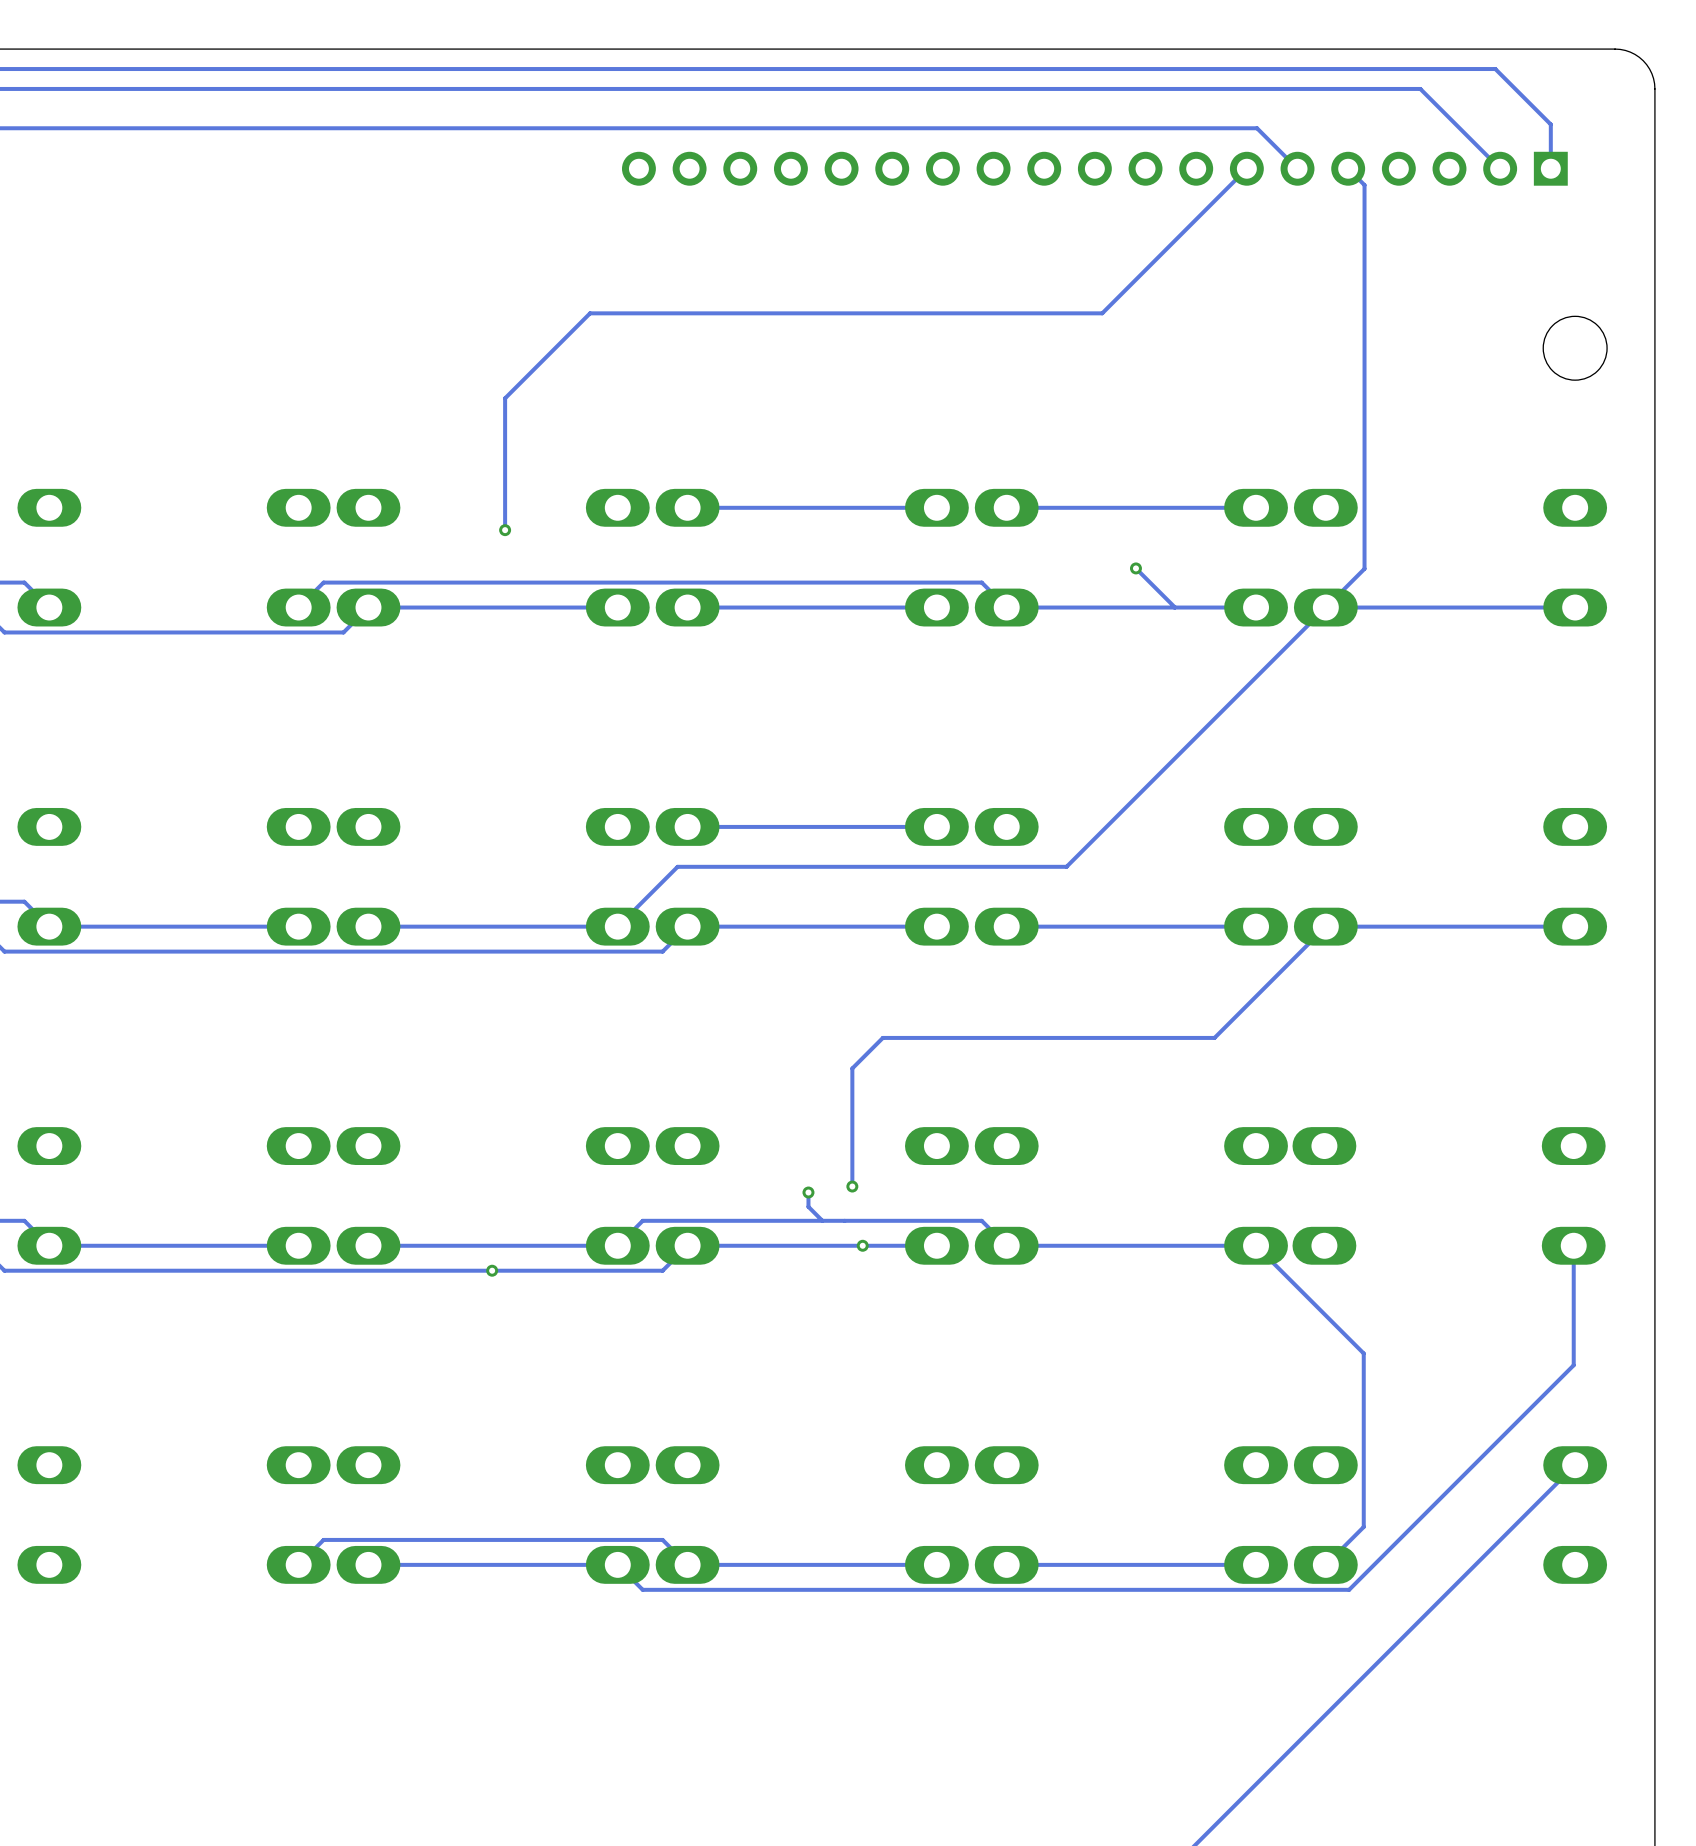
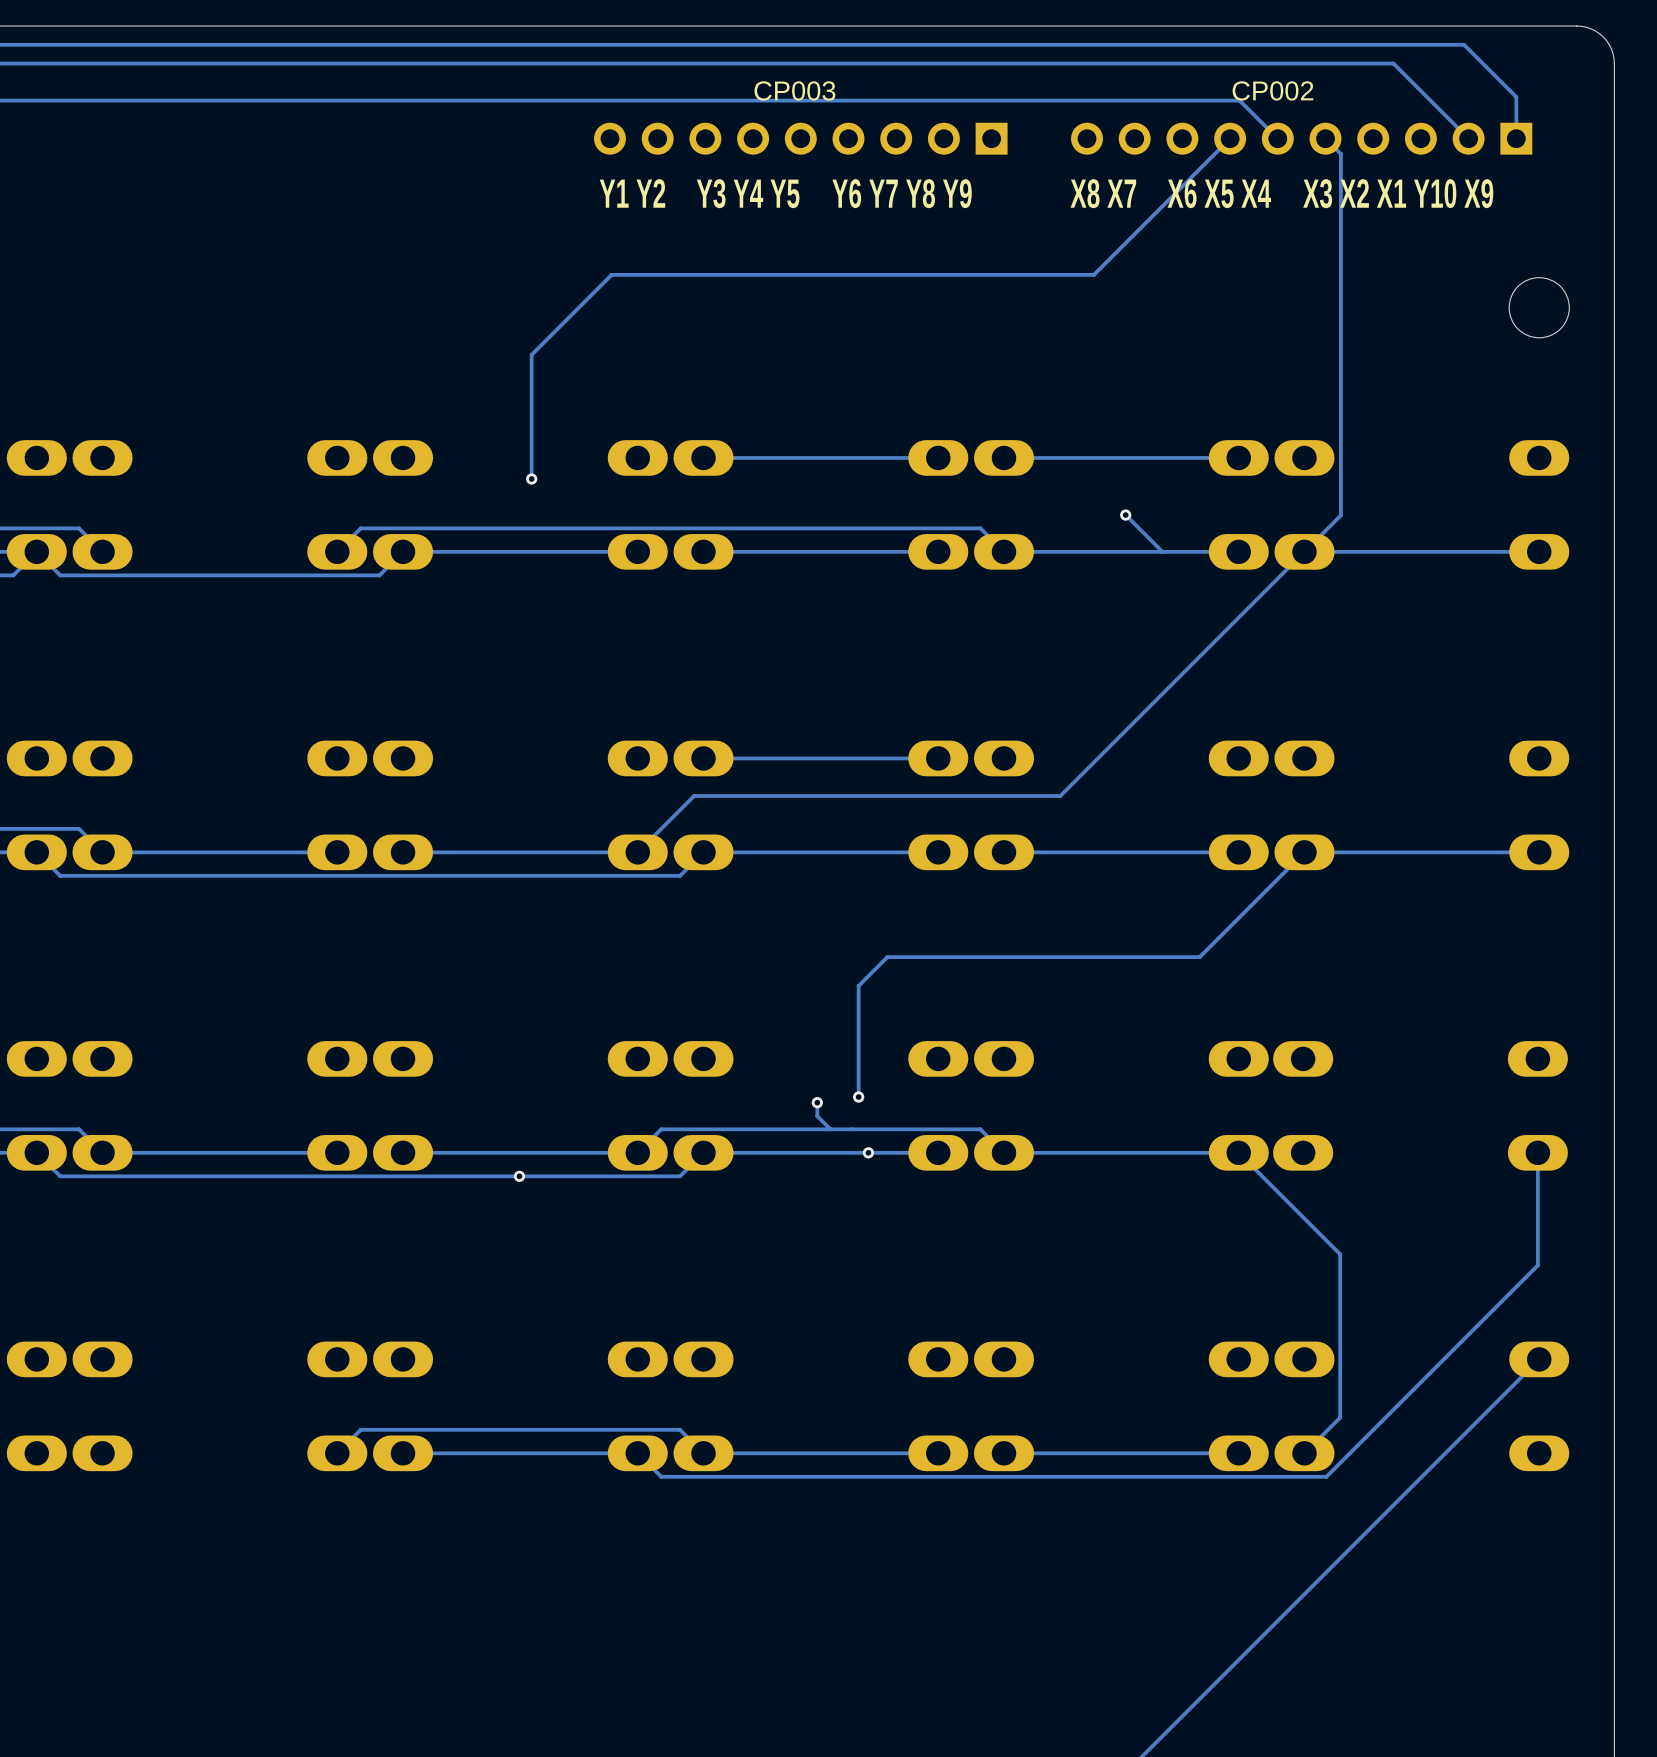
text: none -> CP003 (794, 90)
text: none -> CP002 (1272, 90)
part: none -> (800, 138)
part: (1094, 168) -> none
text: none -> Y1 Y2 (632, 193)
text: none -> Y3 Y4 Y5 (748, 193)
text: none -> Y6 Y7 Y8 Y9 (902, 193)
text: none -> X8 X7 (1103, 193)
text: none -> X6 X5 X4 (1219, 193)
text: none -> X3 X2 X1 Y10 X9 (1398, 193)

